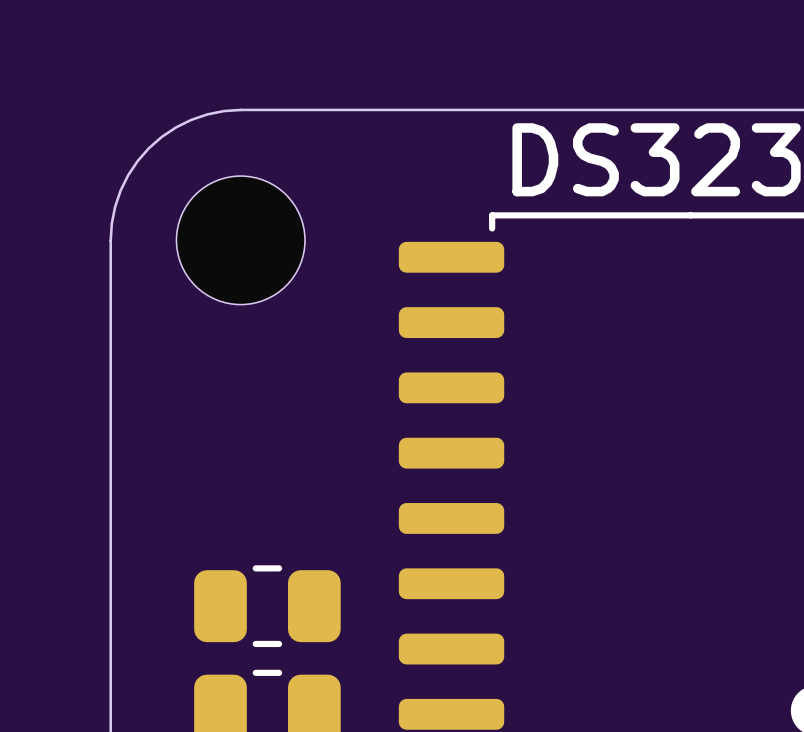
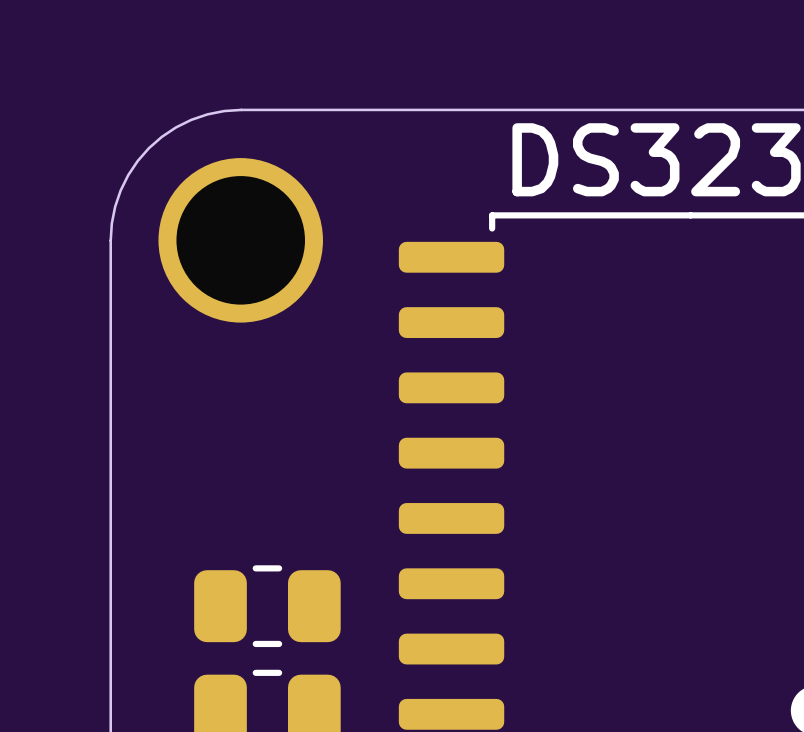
part footprint: [176, 176, 306, 305] -> [158, 158, 323, 323]

